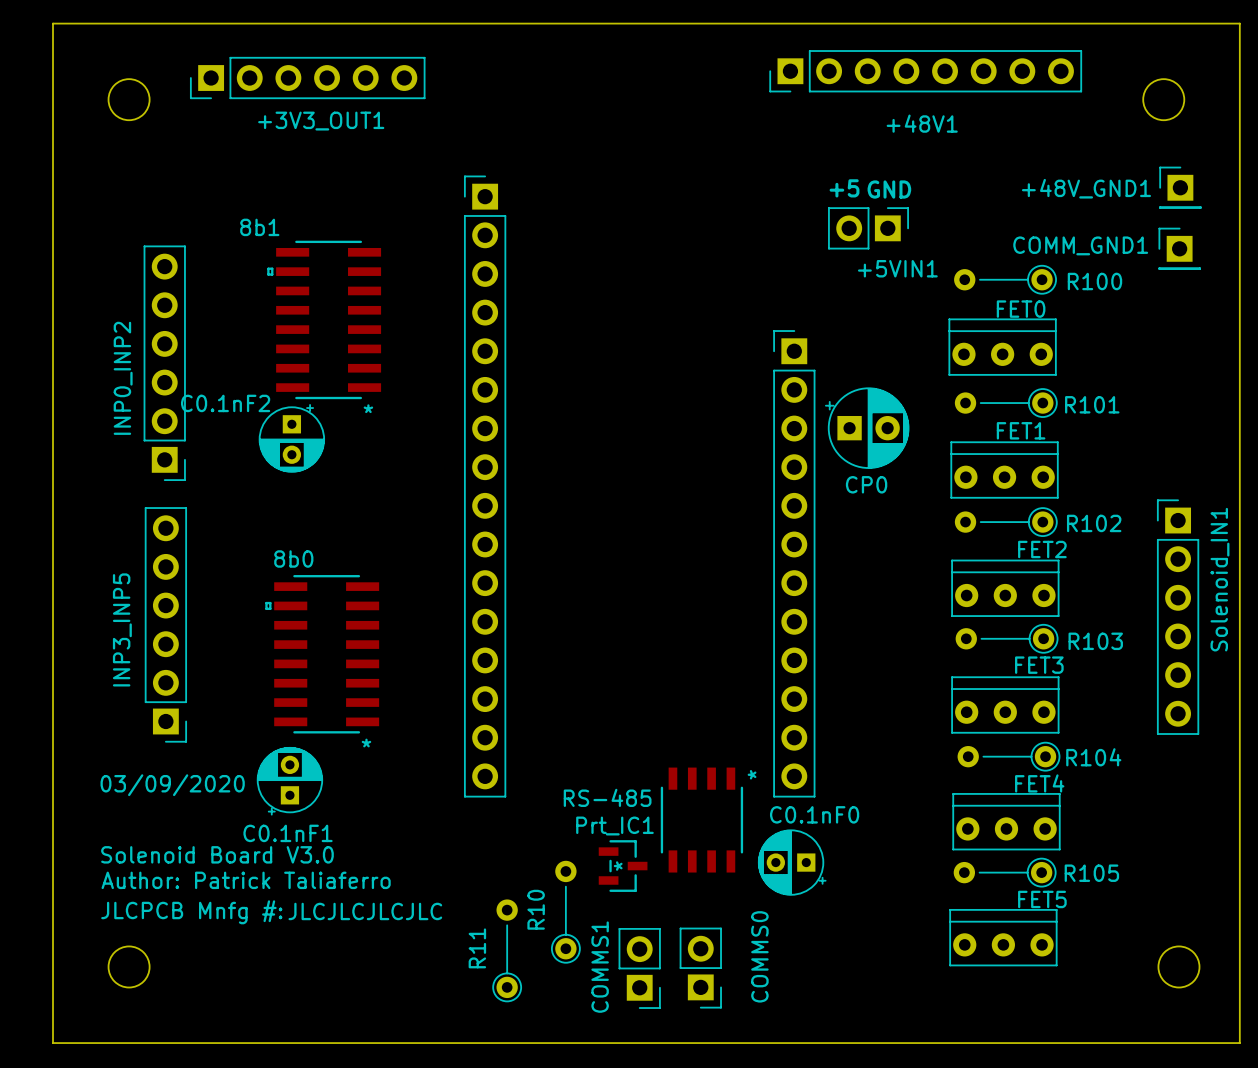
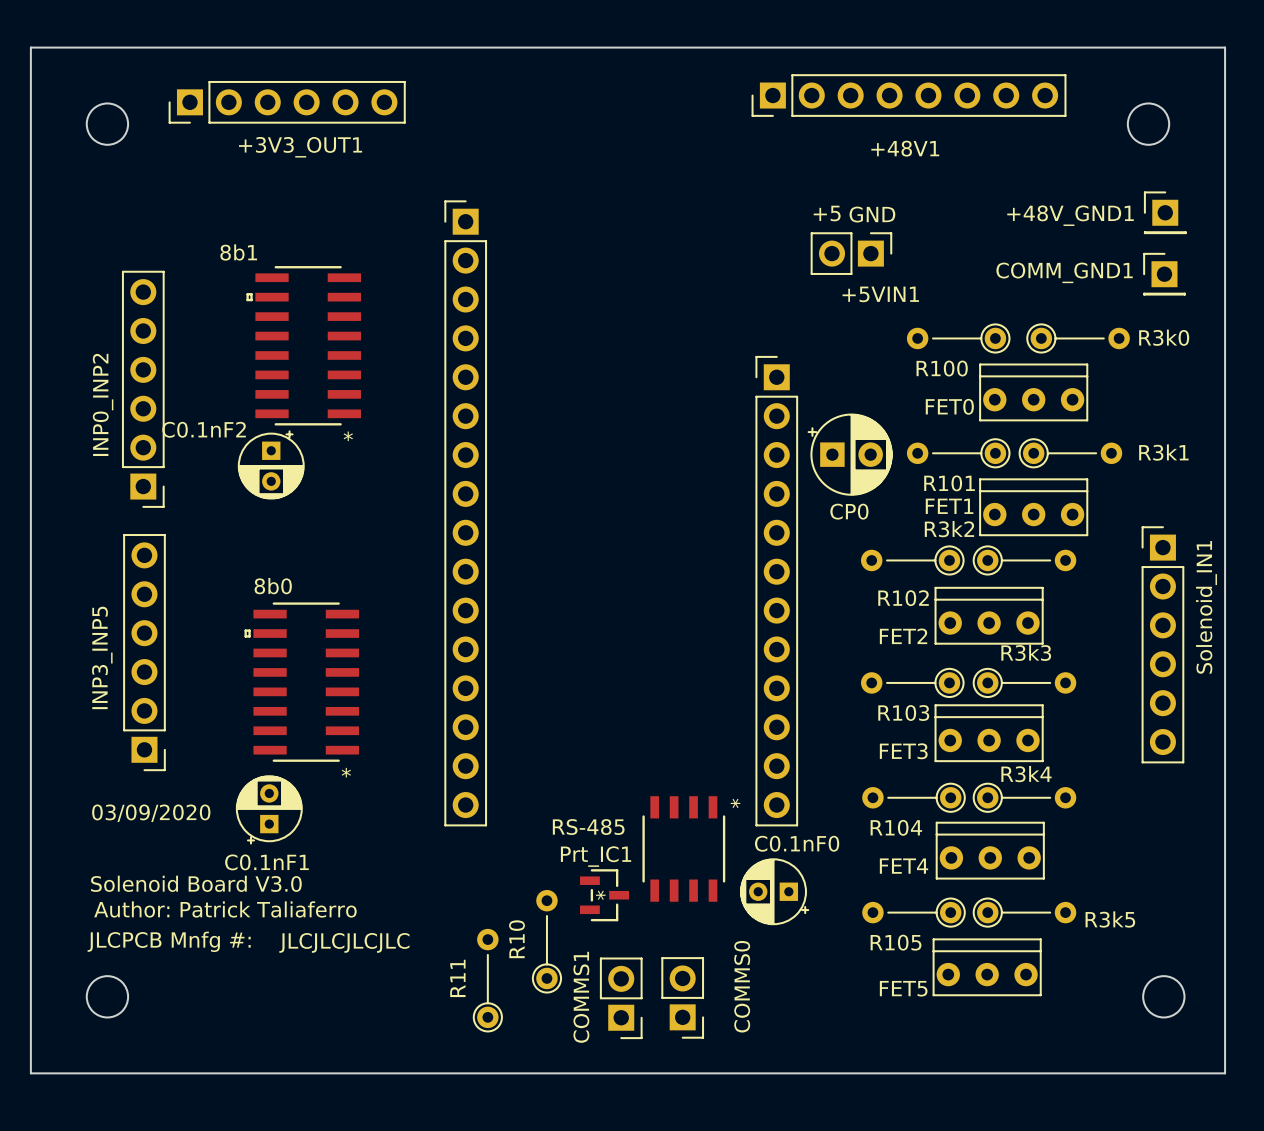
R100 position: (1005, 279) -> (958, 338)
R100 name position: R100 (1094, 281) -> R100 (942, 368)
FET0 name position: FET0 (1021, 309) -> FET0 (949, 406)
R3k0: none -> (1078, 338)
FET0 position: (1002, 347) -> (1033, 392)
R101 position: (1006, 403) -> (958, 453)
R101 name position: R101 (1092, 404) -> R101 (949, 483)
R3k1: none -> (1070, 453)
FET1 name position: FET1 (1021, 430) -> FET1 (949, 506)
FET1 position: (1004, 470) -> (1033, 507)
R102 position: (1006, 522) -> (912, 560)
R102 name position: R102 (1094, 523) -> R102 (903, 598)
R3k2: none -> (1024, 560)
FET2 name position: FET2 (1042, 549) -> FET2 (903, 636)
R103 position: (1007, 638) -> (912, 682)
R103 name position: R103 (1095, 641) -> R103 (903, 713)
R3k3: none -> (1024, 682)
FET3 name position: FET3 (1039, 665) -> FET3 (903, 751)
R104 position: (1009, 756) -> (913, 797)
R104 name position: R104 (1093, 757) -> R104 (896, 827)
R3k4: none -> (1024, 797)
FET4 name position: FET4 (1039, 783) -> FET4 (904, 866)
R105 position: (1005, 872) -> (913, 912)
R105 name position: R105 (1091, 873) -> R105 (896, 942)
R3k5: none -> (1024, 912)
FET5 name position: FET5 (1042, 899) -> FET5 (903, 988)

